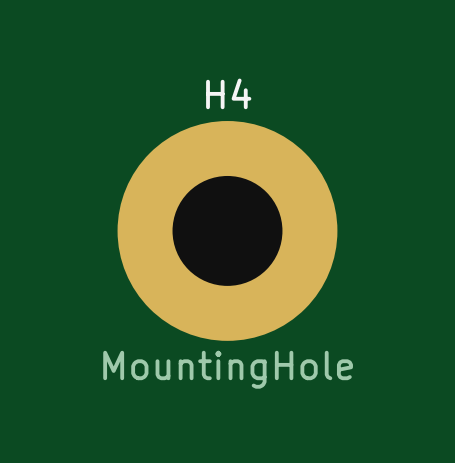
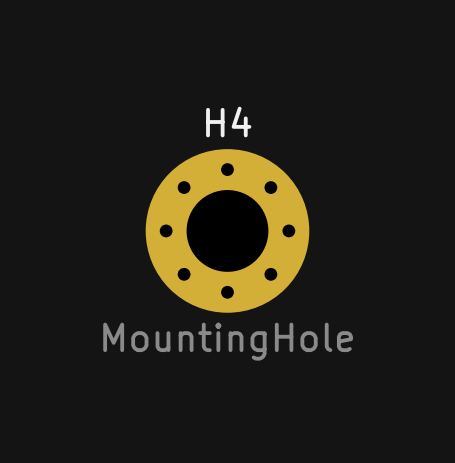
H4 footprint: [117, 121, 338, 341] -> [145, 149, 310, 313]

